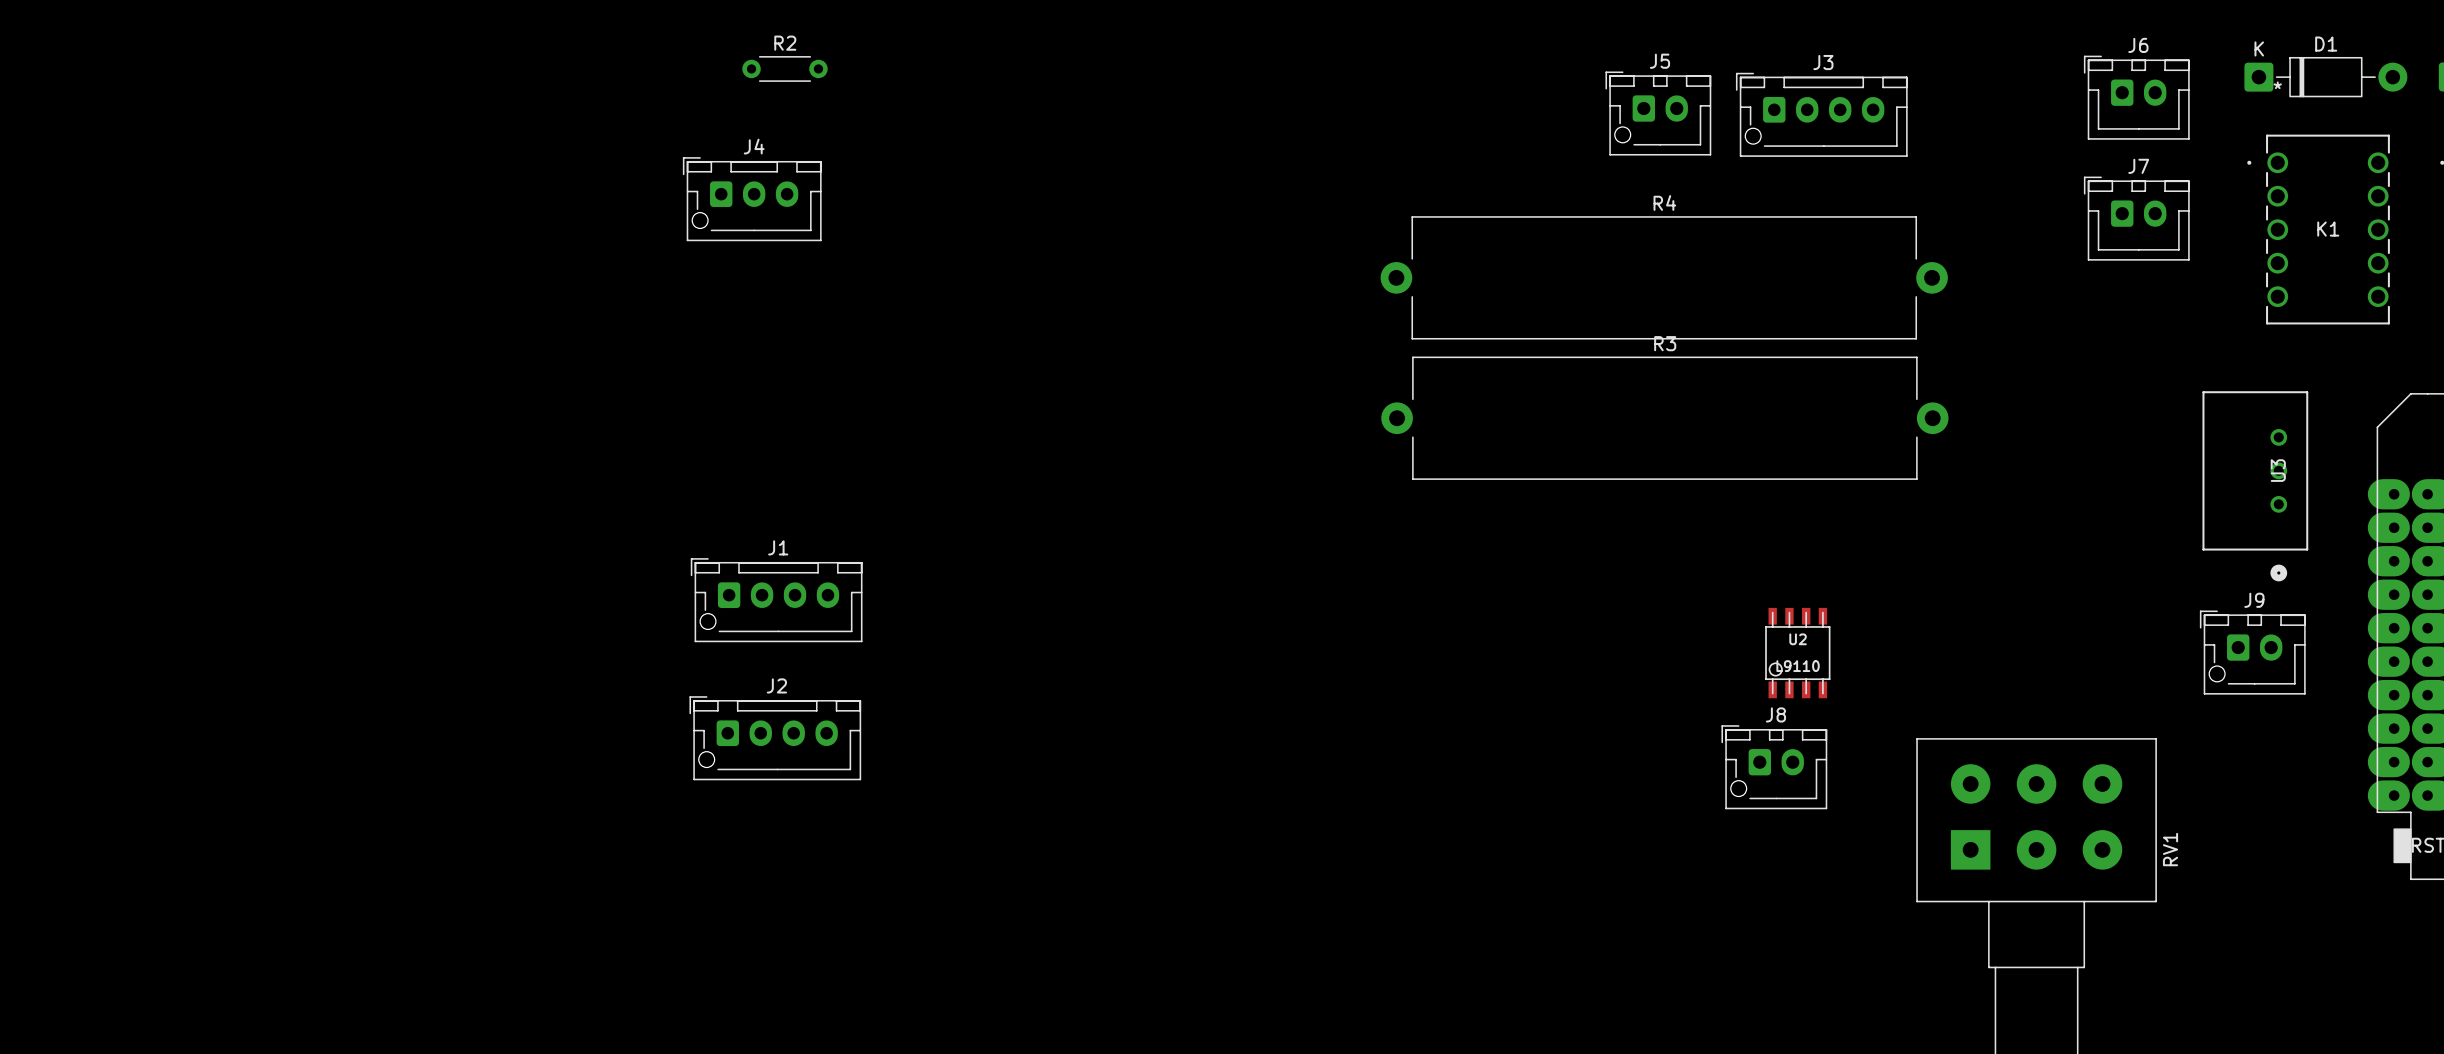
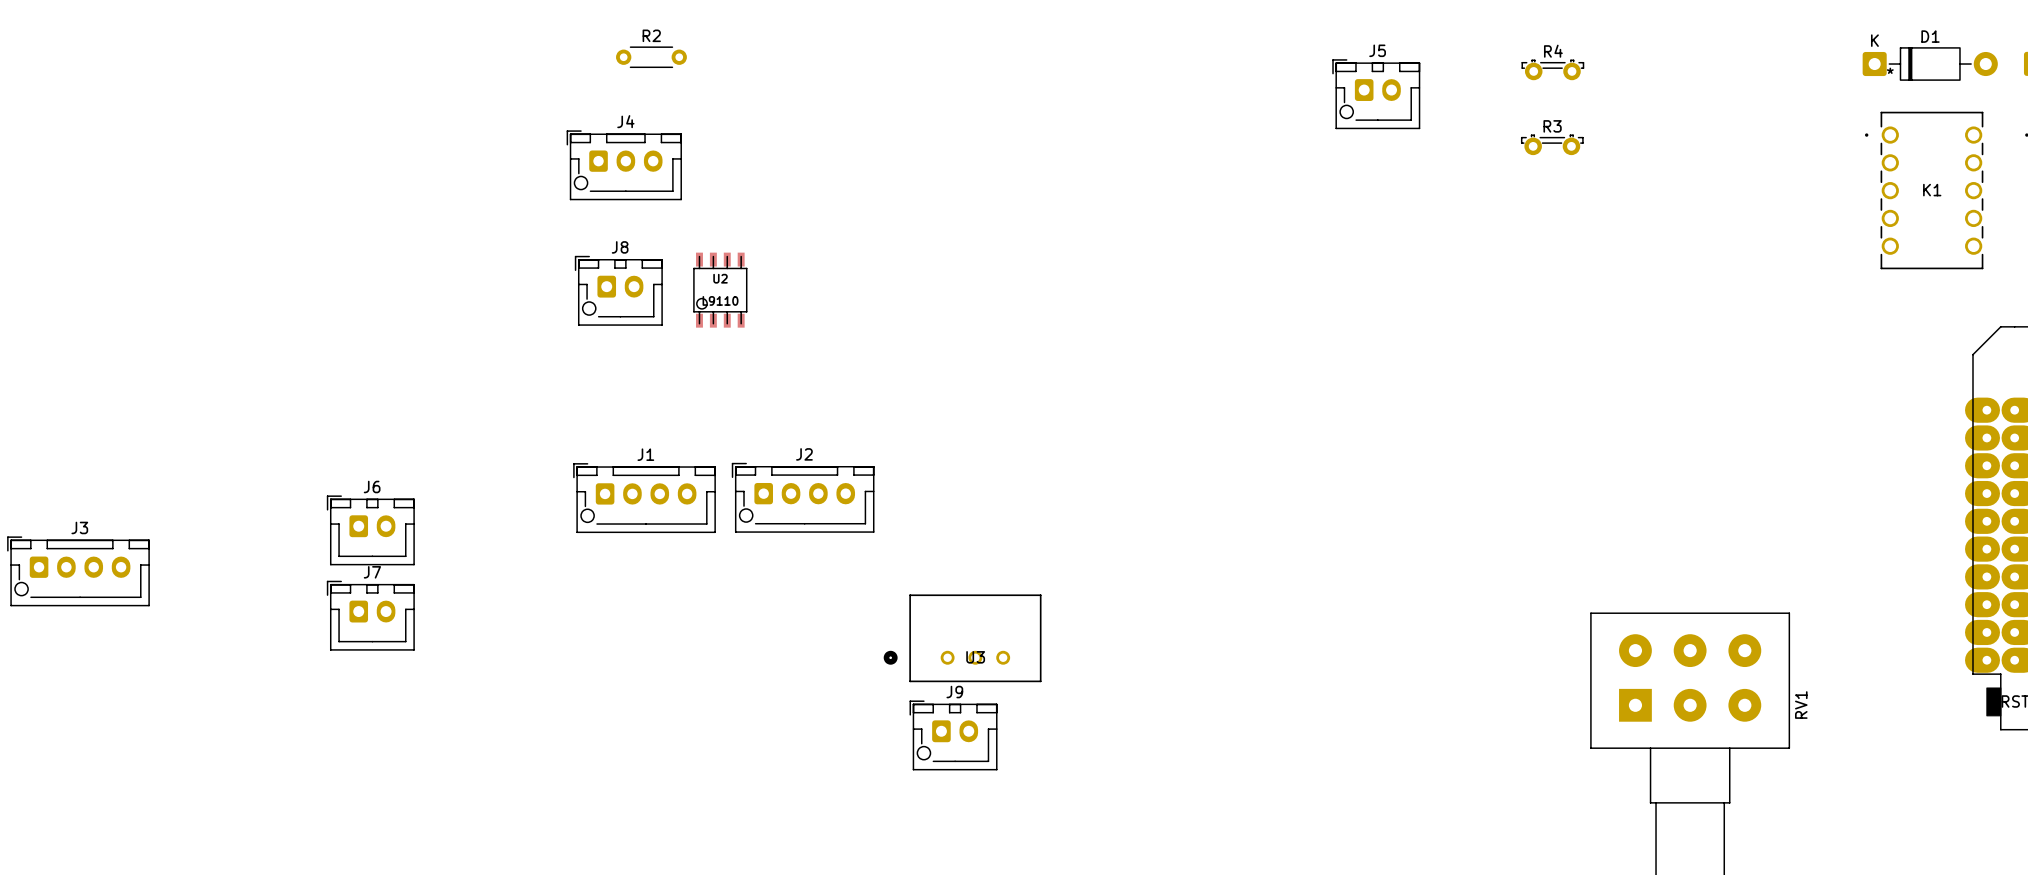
J6 position: (2136, 97) -> (370, 530)
J3 position: (1821, 114) -> (78, 571)
R4 name position: R4 (1664, 202) -> R4 (1553, 51)
R4 footprint: [1380, 216, 1948, 340] -> [1521, 59, 1585, 81]
J7 position: (2136, 218) -> (370, 615)
R3 name position: R3 (1665, 343) -> R3 (1552, 126)
R3 footprint: [1381, 356, 1949, 480] -> [1521, 134, 1584, 156]
U3 rotation: 0° (2255, 486) -> 90° clockwise (962, 638)
U3 position: (2255, 486) -> (962, 638)
J9 position: (2252, 652) -> (953, 735)
U2 position: (1797, 653) -> (720, 290)
J2 position: (775, 738) -> (803, 497)
J8 position: (1774, 767) -> (618, 290)

